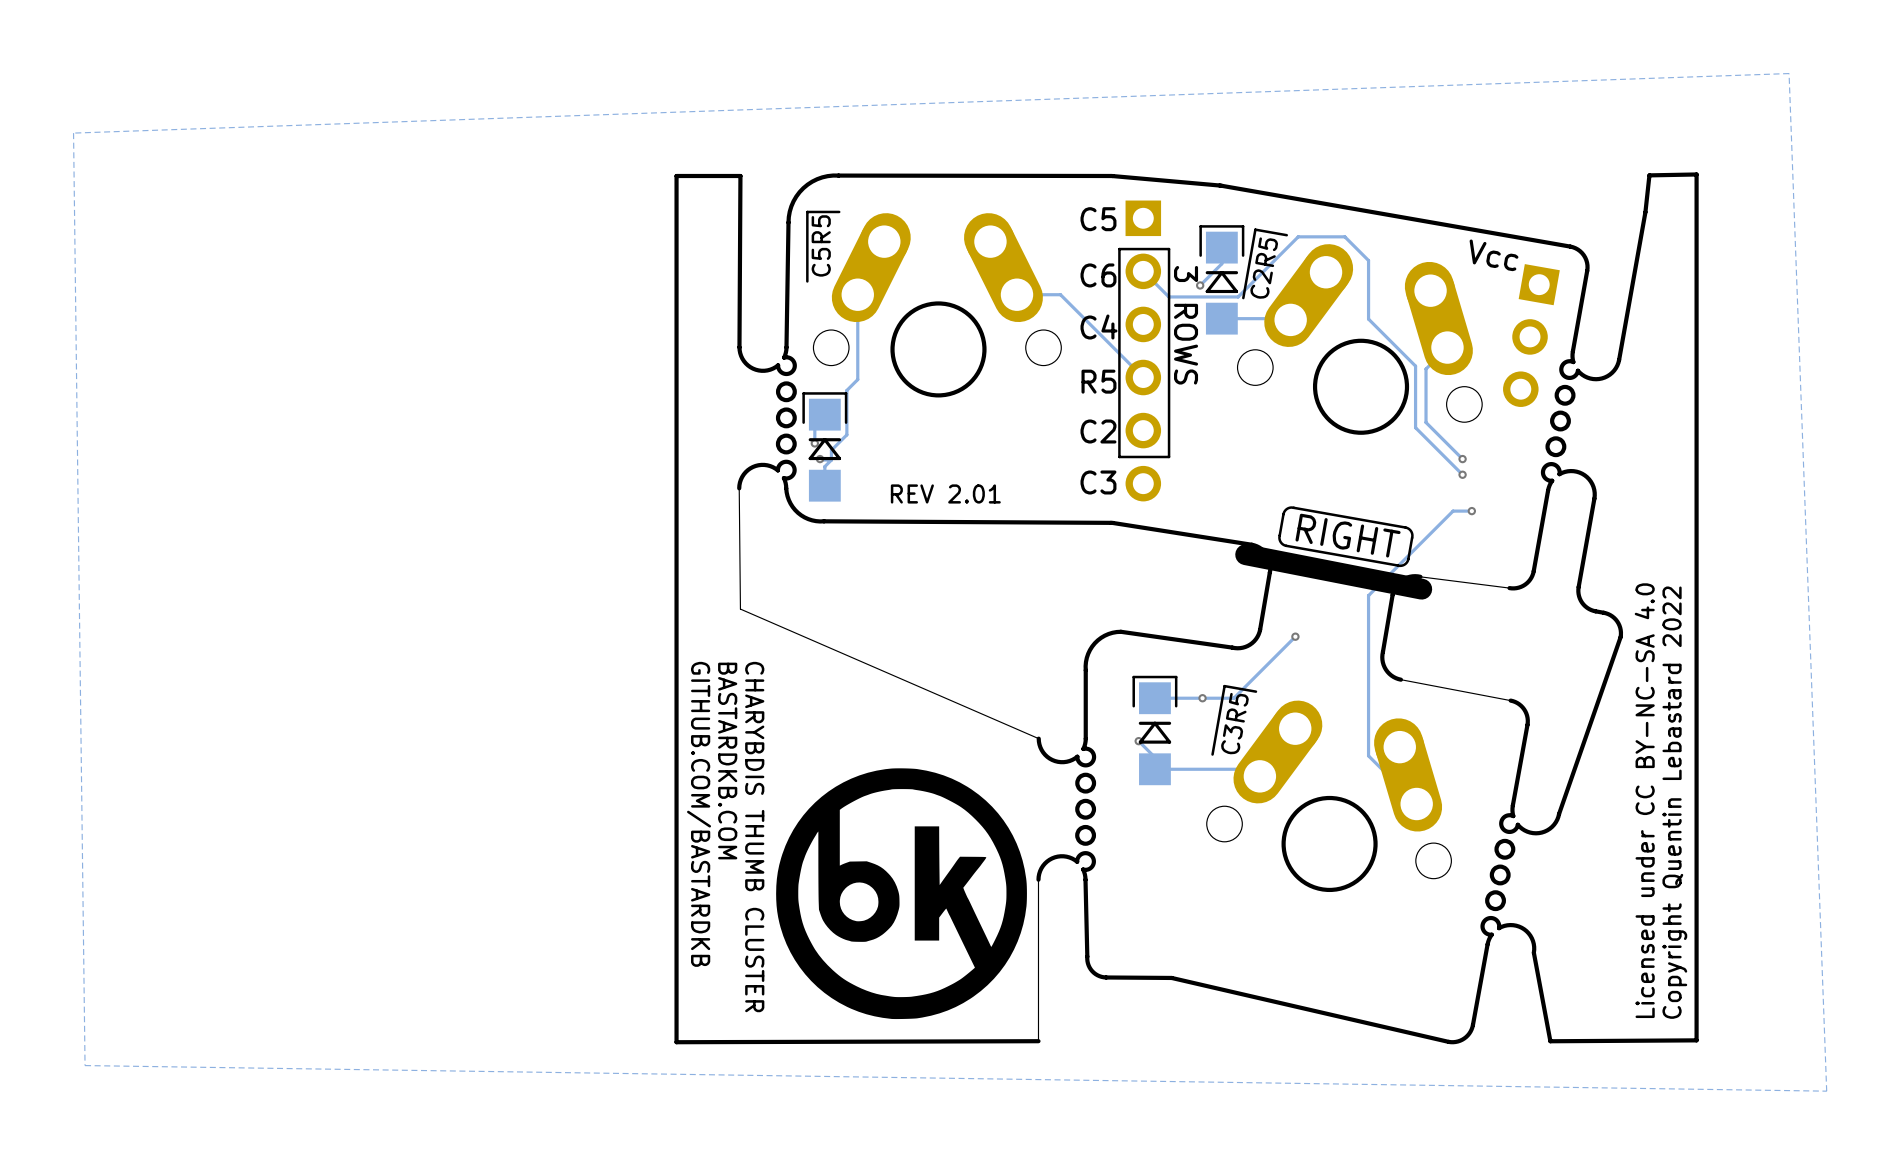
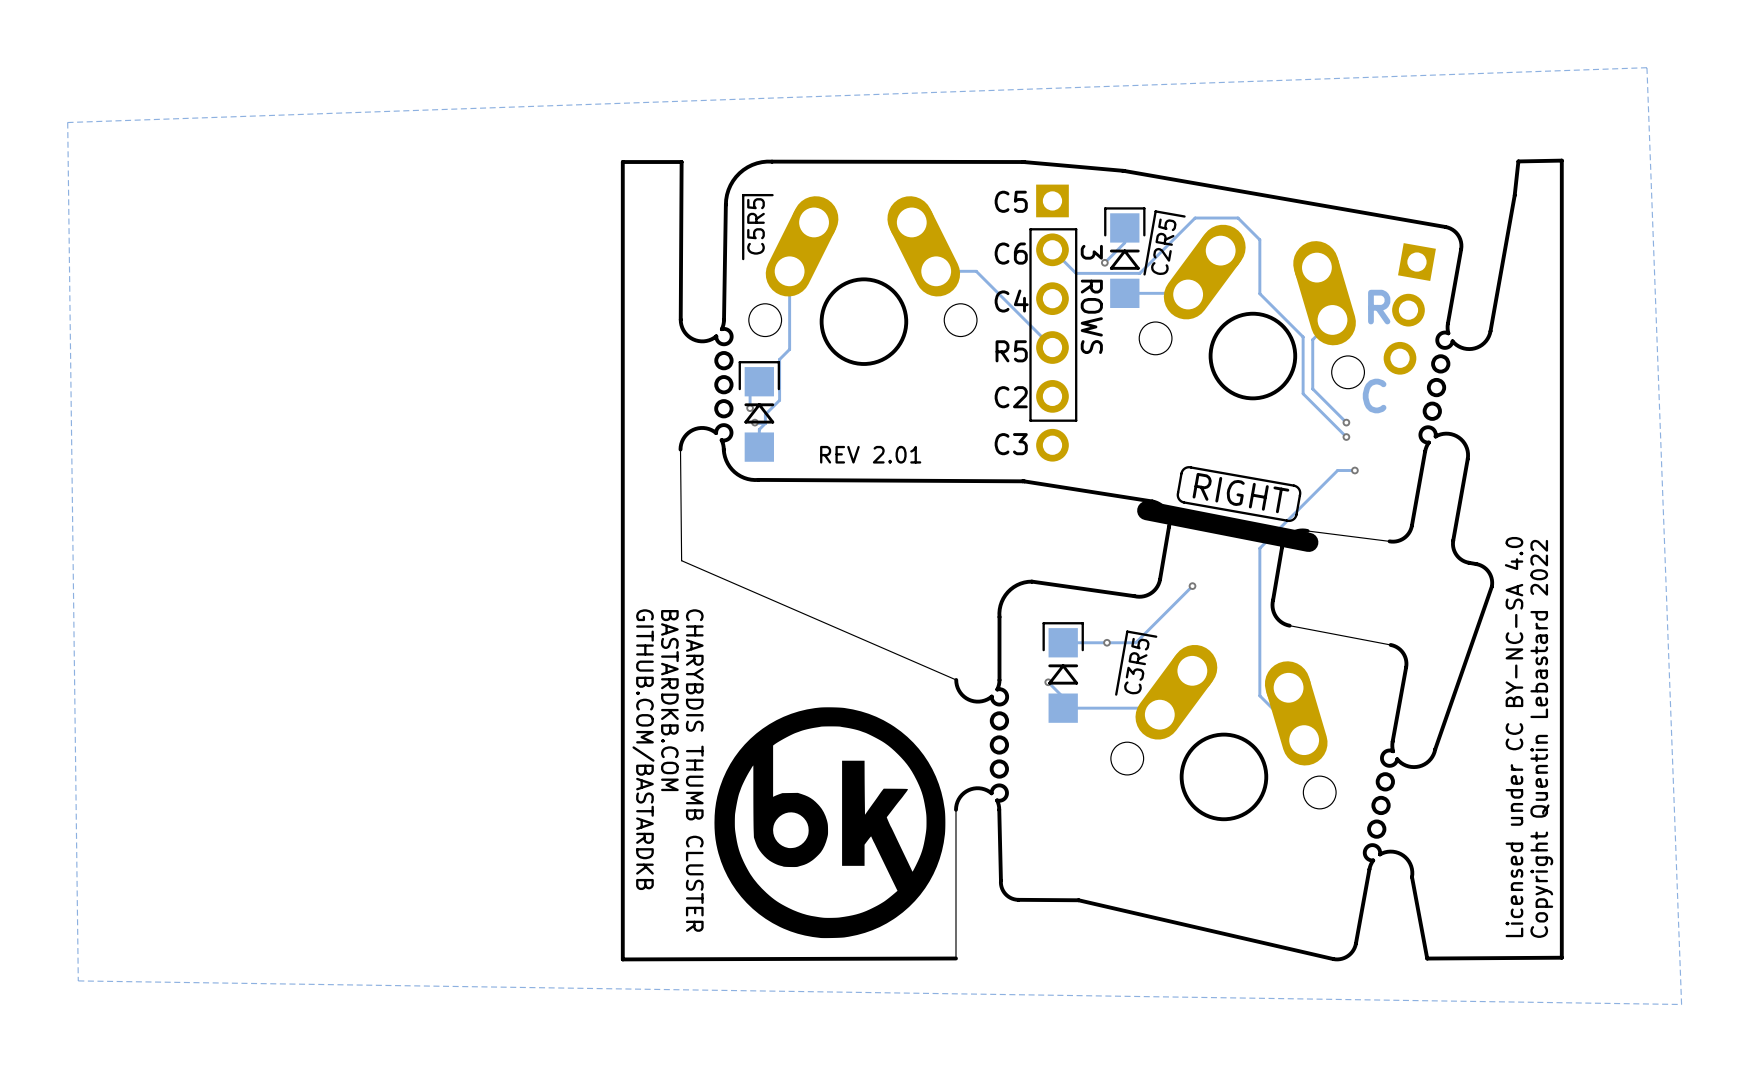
text: Vcc (1494, 255) -> none
text: none -> R (1379, 307)
text: none -> C (1374, 396)

